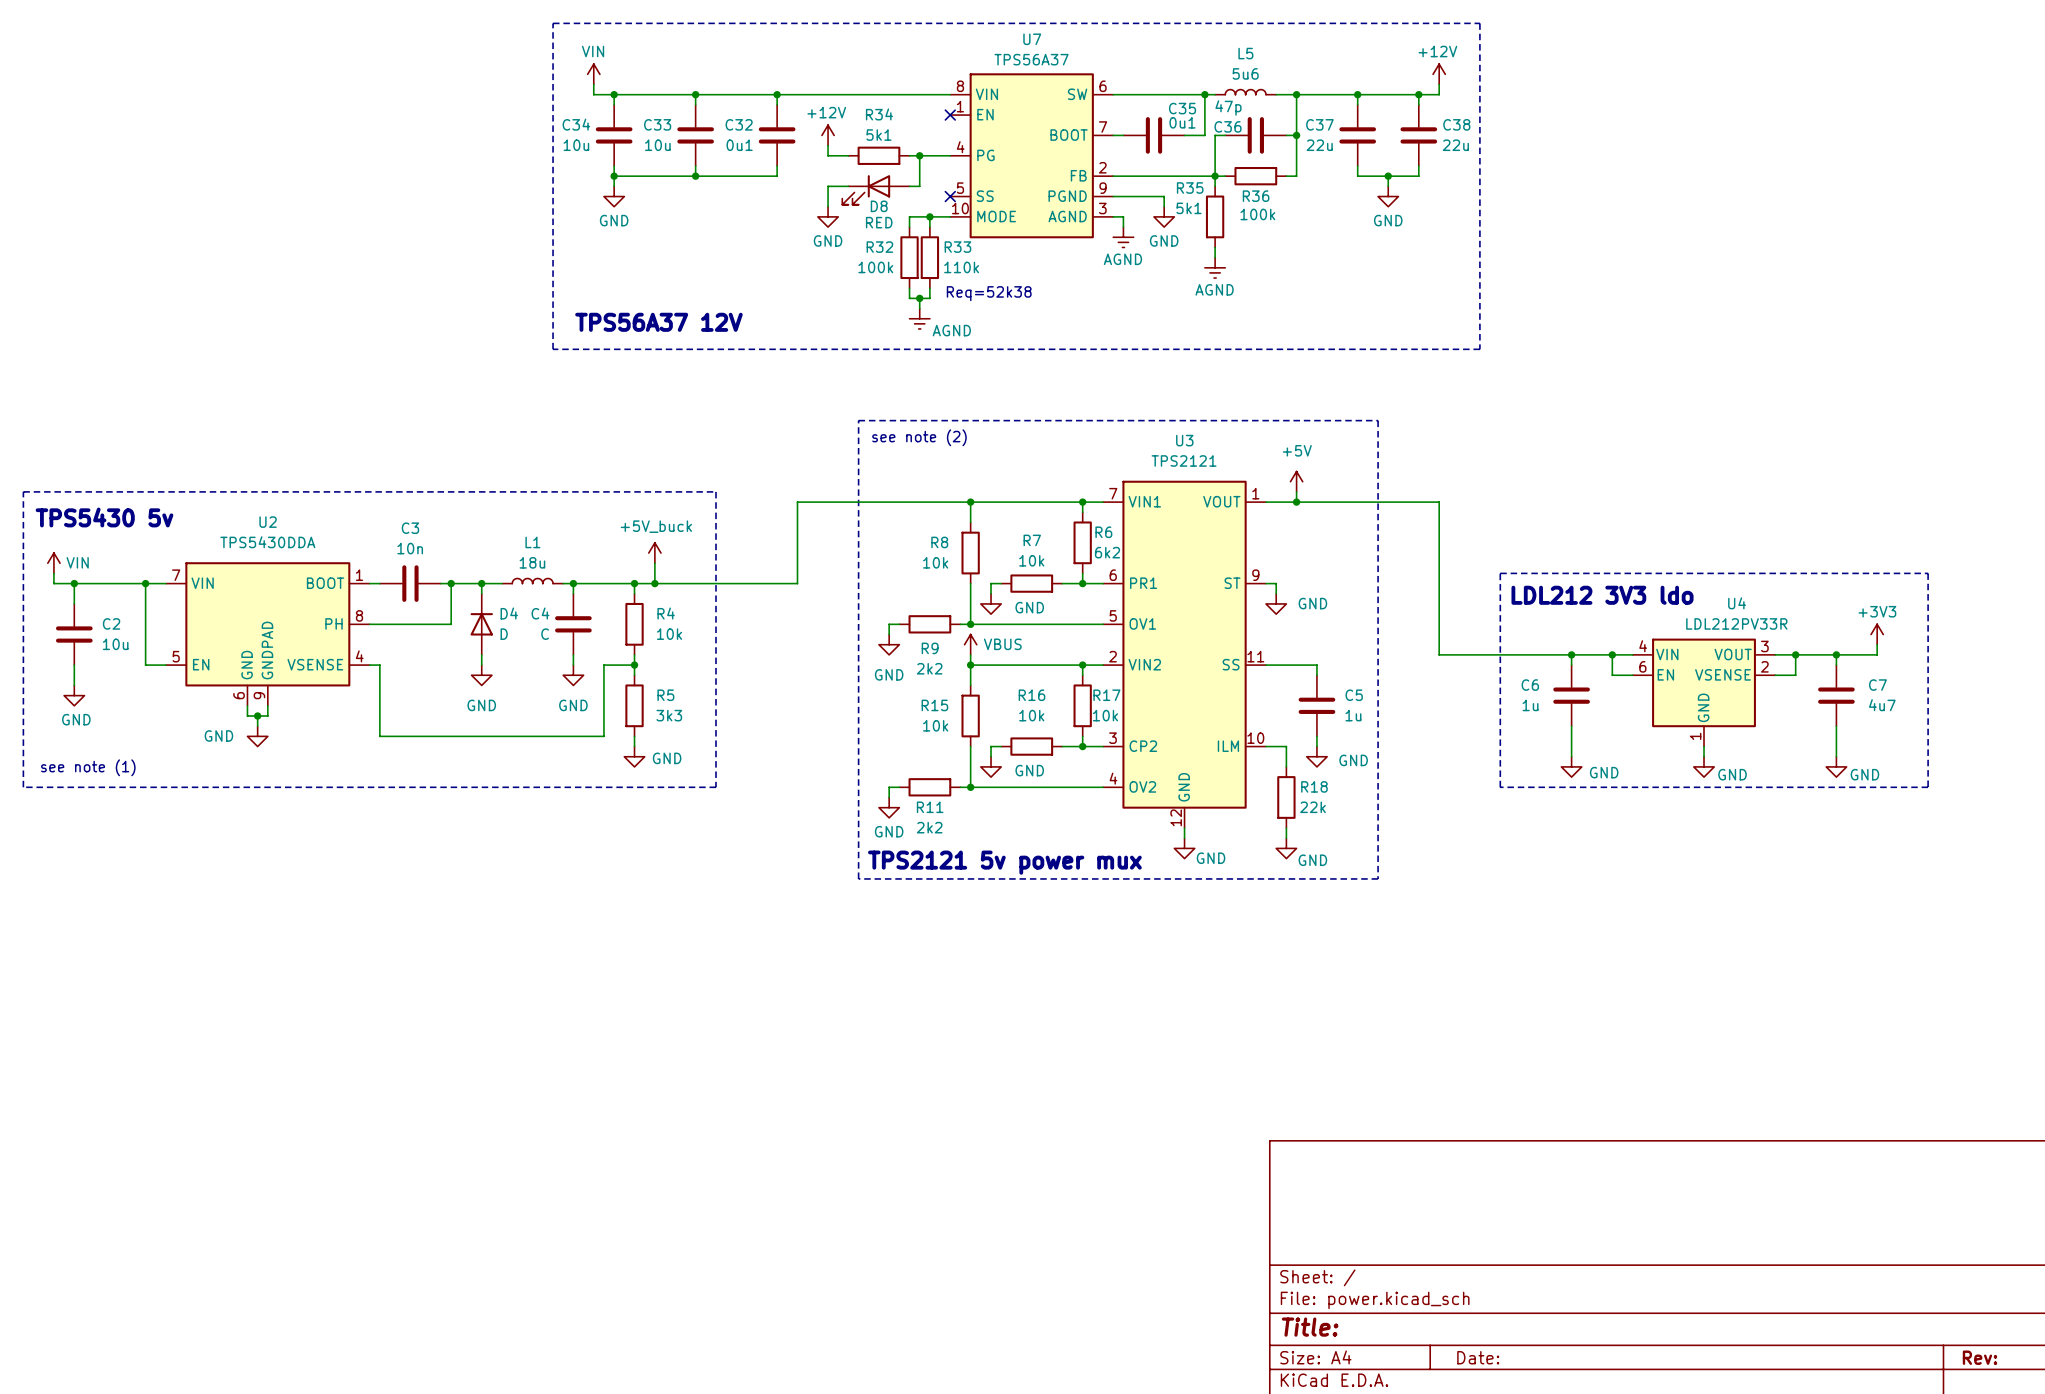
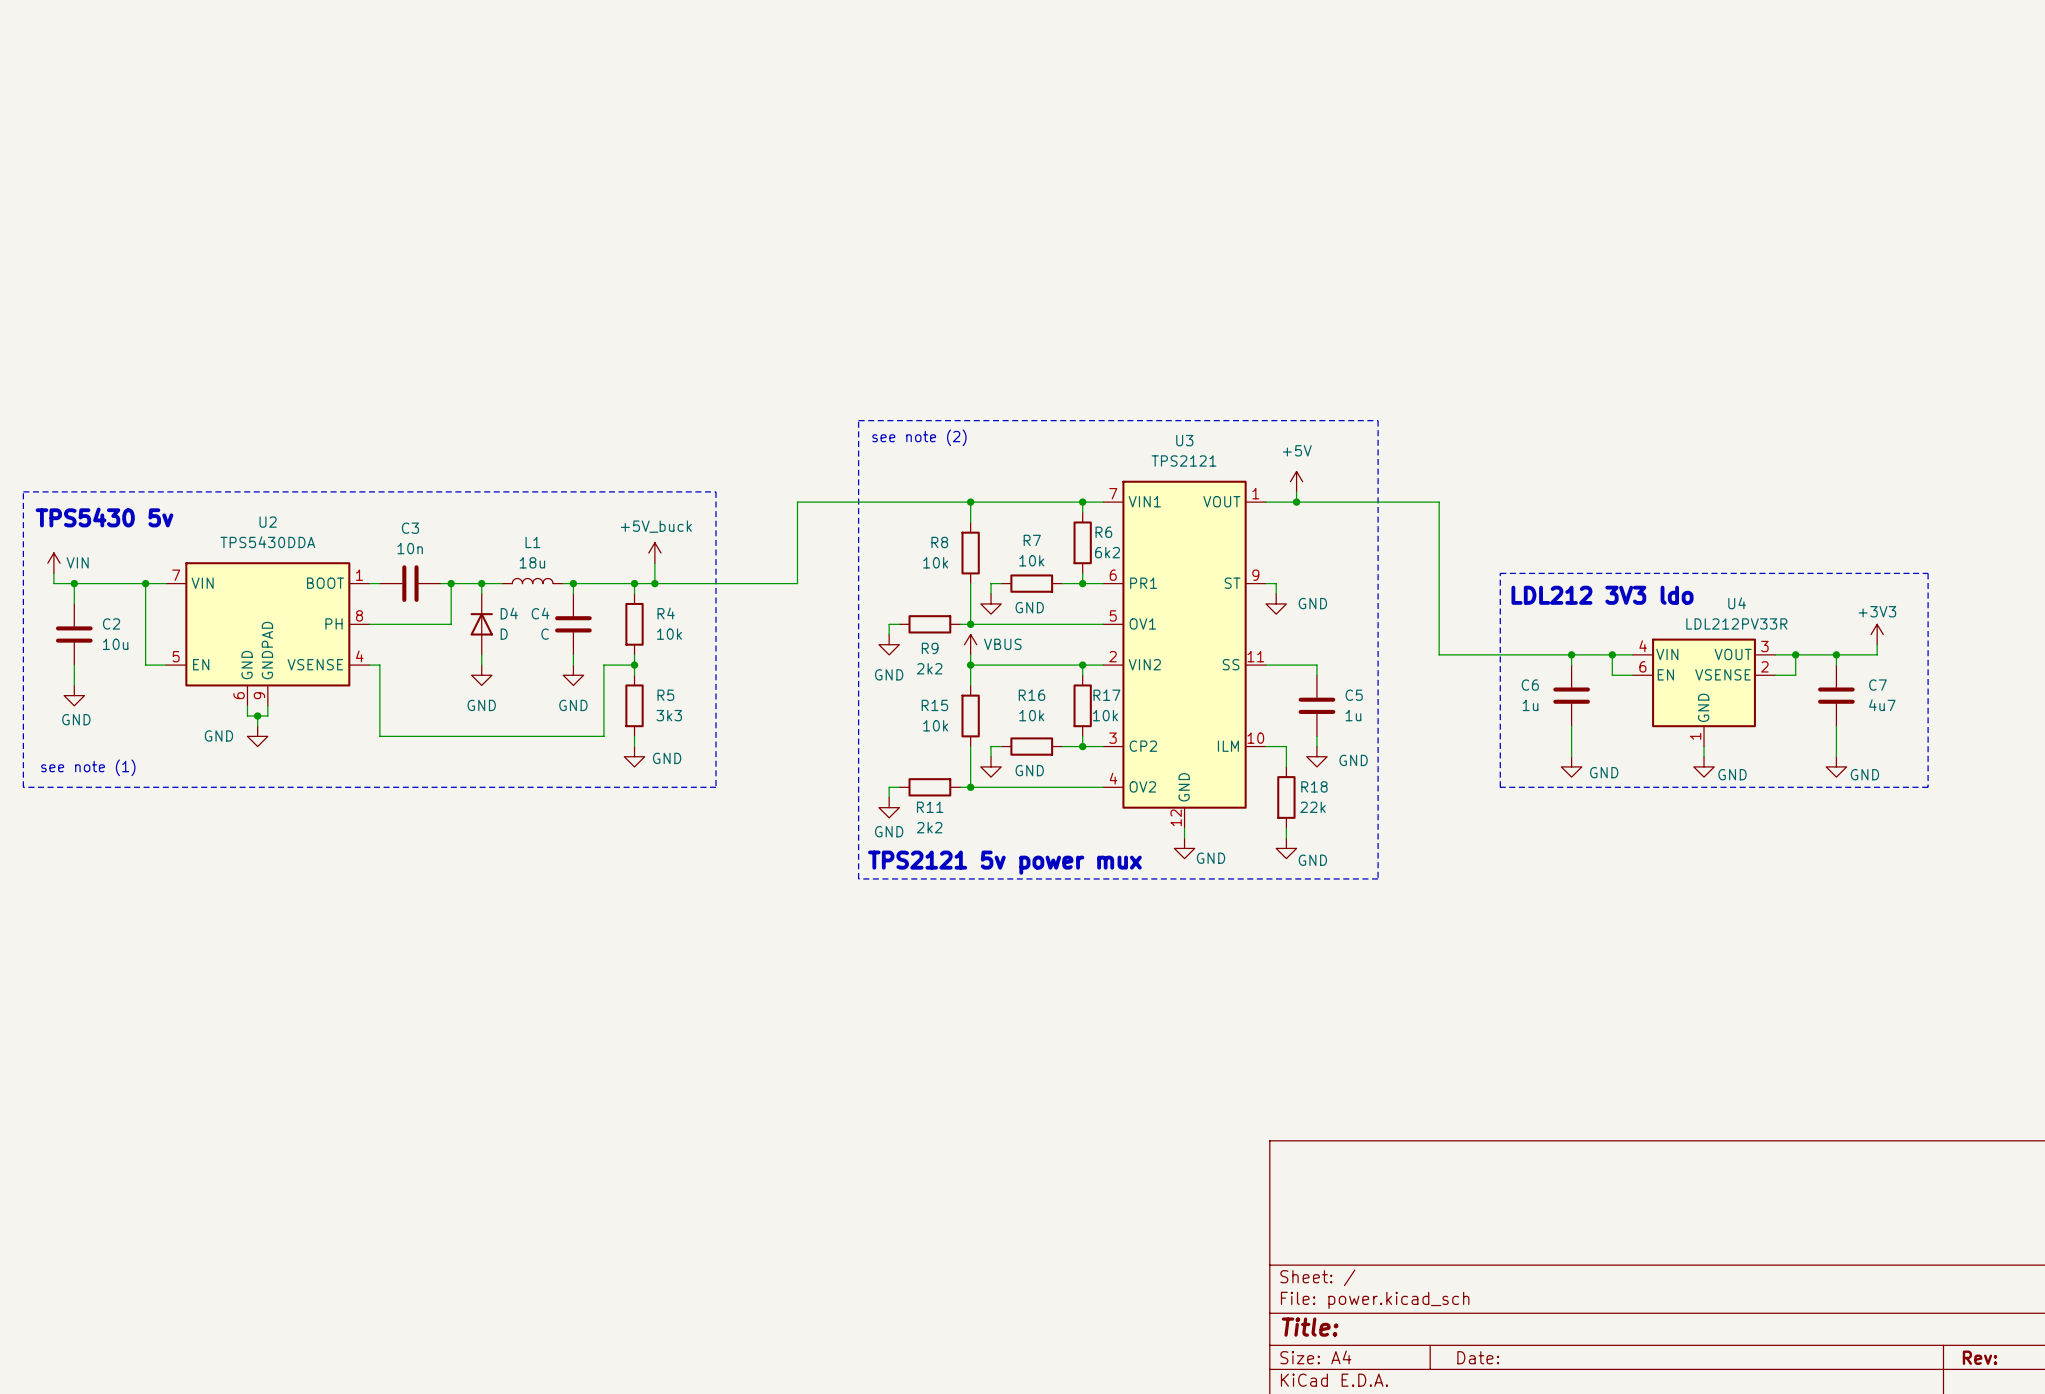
line: (553, 23) (1479, 23) (1479, 349) (553, 349) (553, 23) -> none
power symbol: VIN (593, 74) -> none
power symbol: +12V (1439, 74) -> none
wire: (593, 84) (593, 94) (950, 94) -> none
wire: (1439, 84) (1439, 94) (1276, 94) -> none
L5: 5u6 (1245, 92) -> none
wire: (614, 94) (614, 104) -> none
junction: (614, 94) -> none
wire: (695, 94) (695, 104) -> none
junction: (695, 94) -> none
wire: (777, 94) (777, 104) -> none
junction: (777, 94) -> none
wire: (1113, 94) (1215, 94) -> none
wire: (1204, 94) (1204, 135) (1184, 135) -> none
junction: (1204, 94) -> none
wire: (1296, 94) (1296, 176) (1286, 176) -> none
junction: (1296, 94) -> none
wire: (1357, 94) (1357, 104) -> none
junction: (1357, 94) -> none
wire: (1418, 94) (1418, 104) -> none
junction: (1418, 94) -> none
no-connect mark: (950, 115) -> none
C34: 10u (614, 135) -> none
C33: 10u (695, 135) -> none
C32: 0u1 (777, 135) -> none
power symbol: +12V (828, 135) -> none
wire: (1113, 135) (1123, 135) -> none
C35: 0u1 (1153, 135) -> none
wire: (1225, 135) (1215, 135) (1215, 186) -> none
C36: 47p (1255, 135) -> none
wire: (1286, 135) (1296, 135) -> none
junction: (1296, 135) -> none
C37: 22u (1357, 135) -> none
C38: 22u (1418, 135) -> none
wire: (828, 145) (828, 155) (848, 155) -> none
R34: 5k1 (878, 155) -> none
wire: (909, 155) (950, 155) -> none
wire: (919, 155) (919, 186) (909, 186) -> none
junction: (919, 155) -> none
U7: TPS56A37 (1031, 155) -> none
wire: (614, 165) (614, 186) -> none
wire: (695, 165) (695, 176) -> none
wire: (777, 165) (777, 176) (614, 176) -> none
wire: (1357, 165) (1357, 176) (1418, 176) (1418, 165) -> none
junction: (614, 176) -> none
junction: (695, 176) -> none
wire: (1113, 176) (1225, 176) -> none
junction: (1215, 176) -> none
R36: 100k (1255, 176) -> none
wire: (1388, 176) (1388, 186) -> none
junction: (1388, 176) -> none
wire: (848, 186) (828, 186) (828, 206) -> none
D8: RED (875, 189) -> none
power symbol: GND (614, 196) -> none
no-connect mark: (950, 196) -> none
wire: (1113, 196) (1164, 196) (1164, 206) -> none
power symbol: GND (1388, 196) -> none
power symbol: GND (828, 216) -> none
wire: (929, 216) (929, 227) -> none
junction: (929, 216) -> none
wire: (950, 216) (909, 216) (909, 227) -> none
wire: (1113, 216) (1123, 216) (1123, 227) -> none
power symbol: GND (1164, 216) -> none
R35: 5k1 (1215, 216) -> none
power symbol: AGND (1123, 237) -> none
wire: (1215, 247) (1215, 257) -> none
R32: 100k (909, 257) -> none
R33: 110k (929, 257) -> none
power symbol: AGND (1215, 267) -> none
wire: (909, 288) (909, 298) (929, 298) (929, 288) -> none
text: Req=52k38 (989, 293) -> none
wire: (919, 298) (919, 308) -> none
junction: (919, 298) -> none
power symbol: AGND (919, 318) -> none
text: TPS56A37 12V (658, 322) -> none

